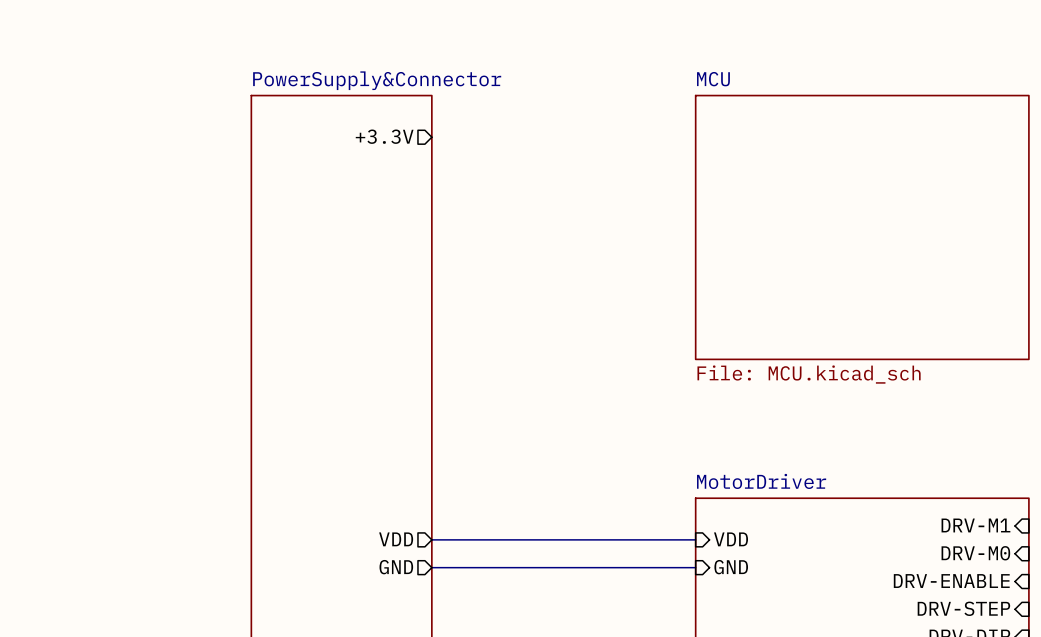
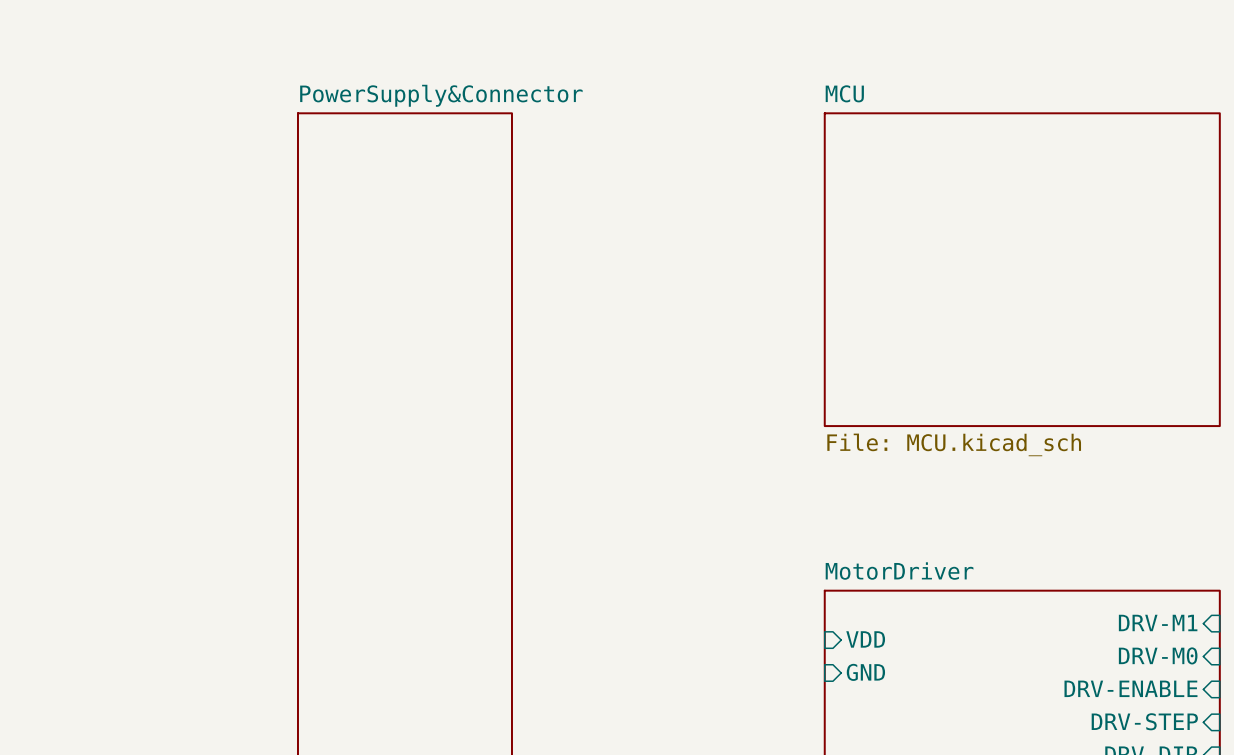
sheet pin: +3.3V (384, 136) -> none
sheet pin: VDD (396, 539) -> none
wire: (431, 539) (695, 539) -> none
sheet pin: GND (396, 567) -> none
wire: (431, 567) (695, 567) -> none

